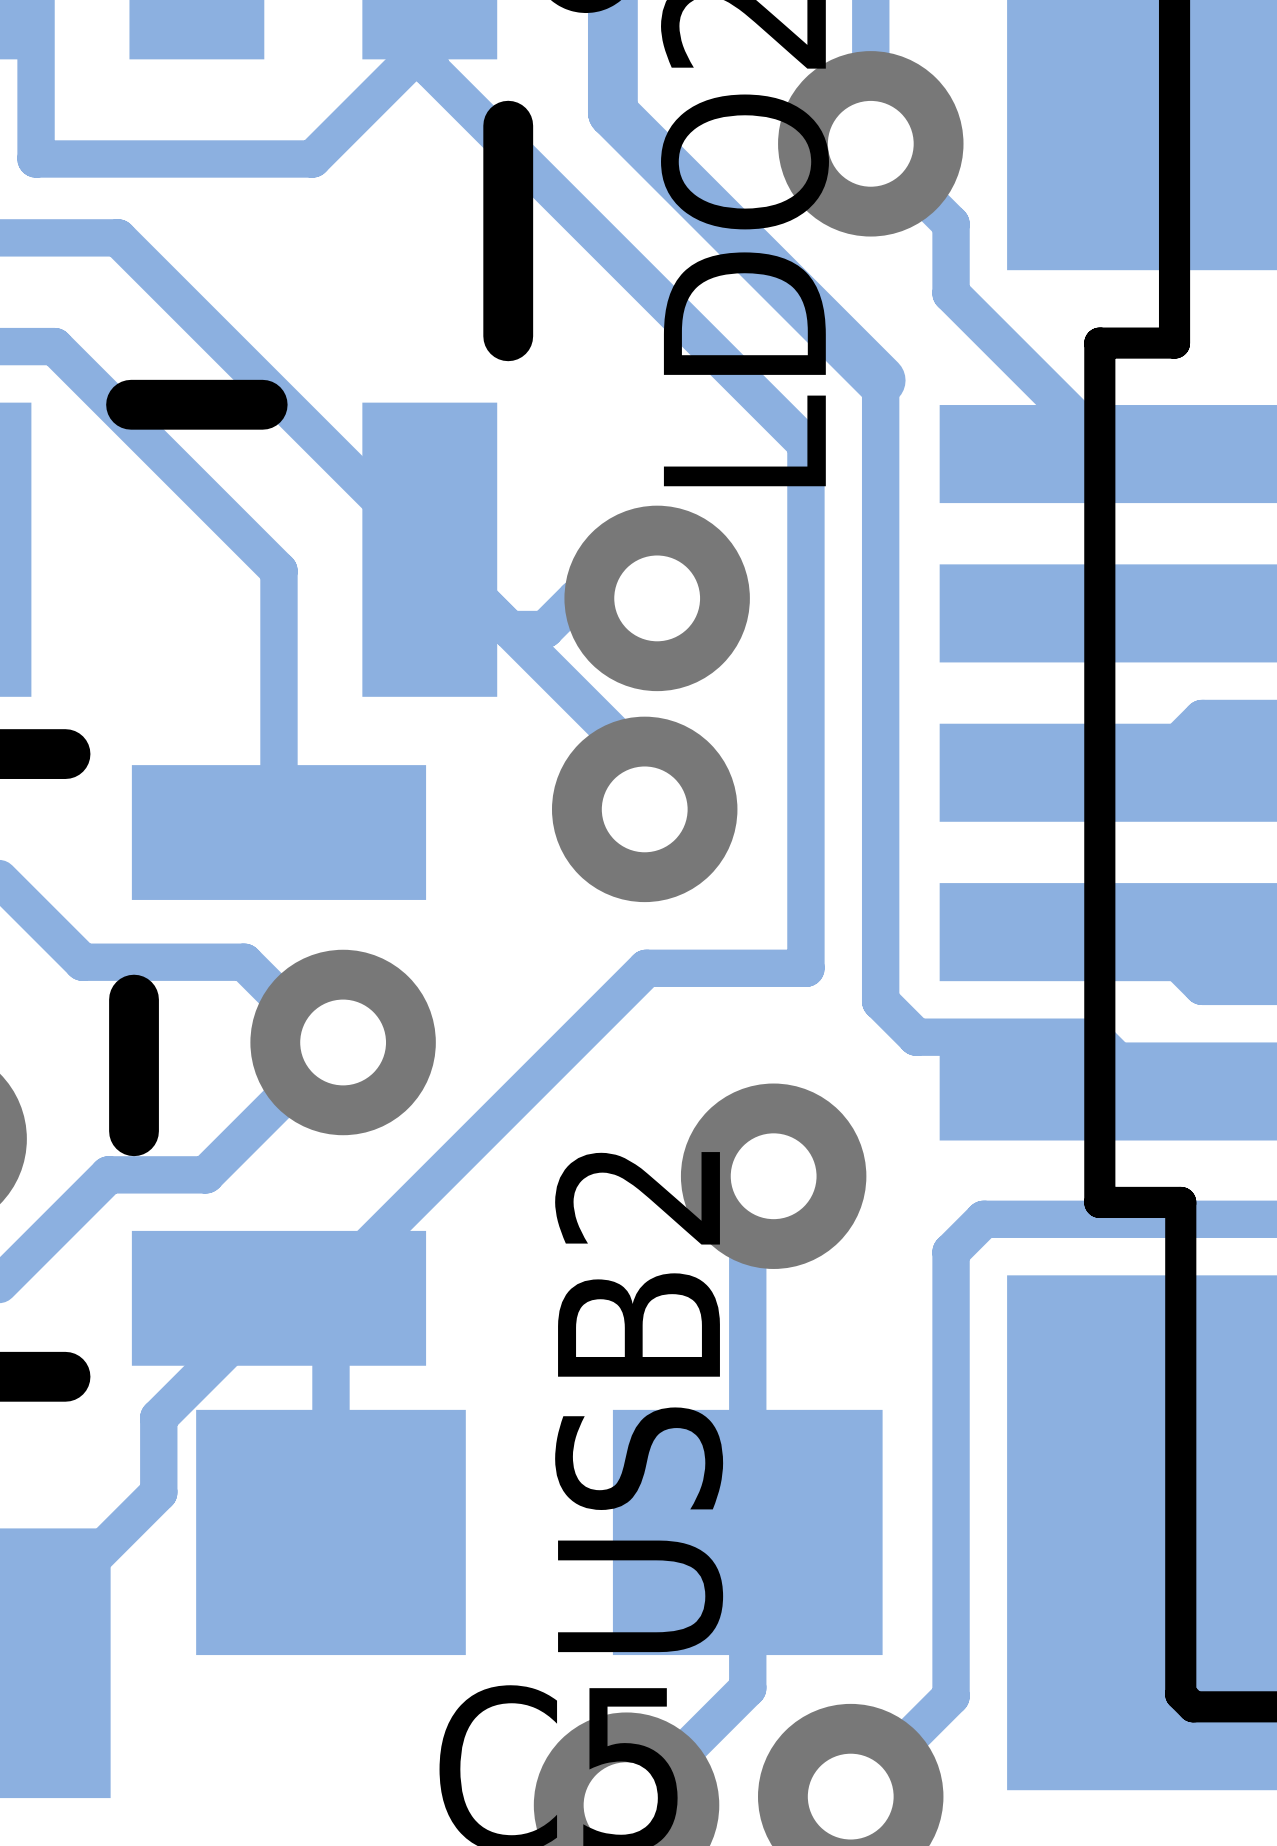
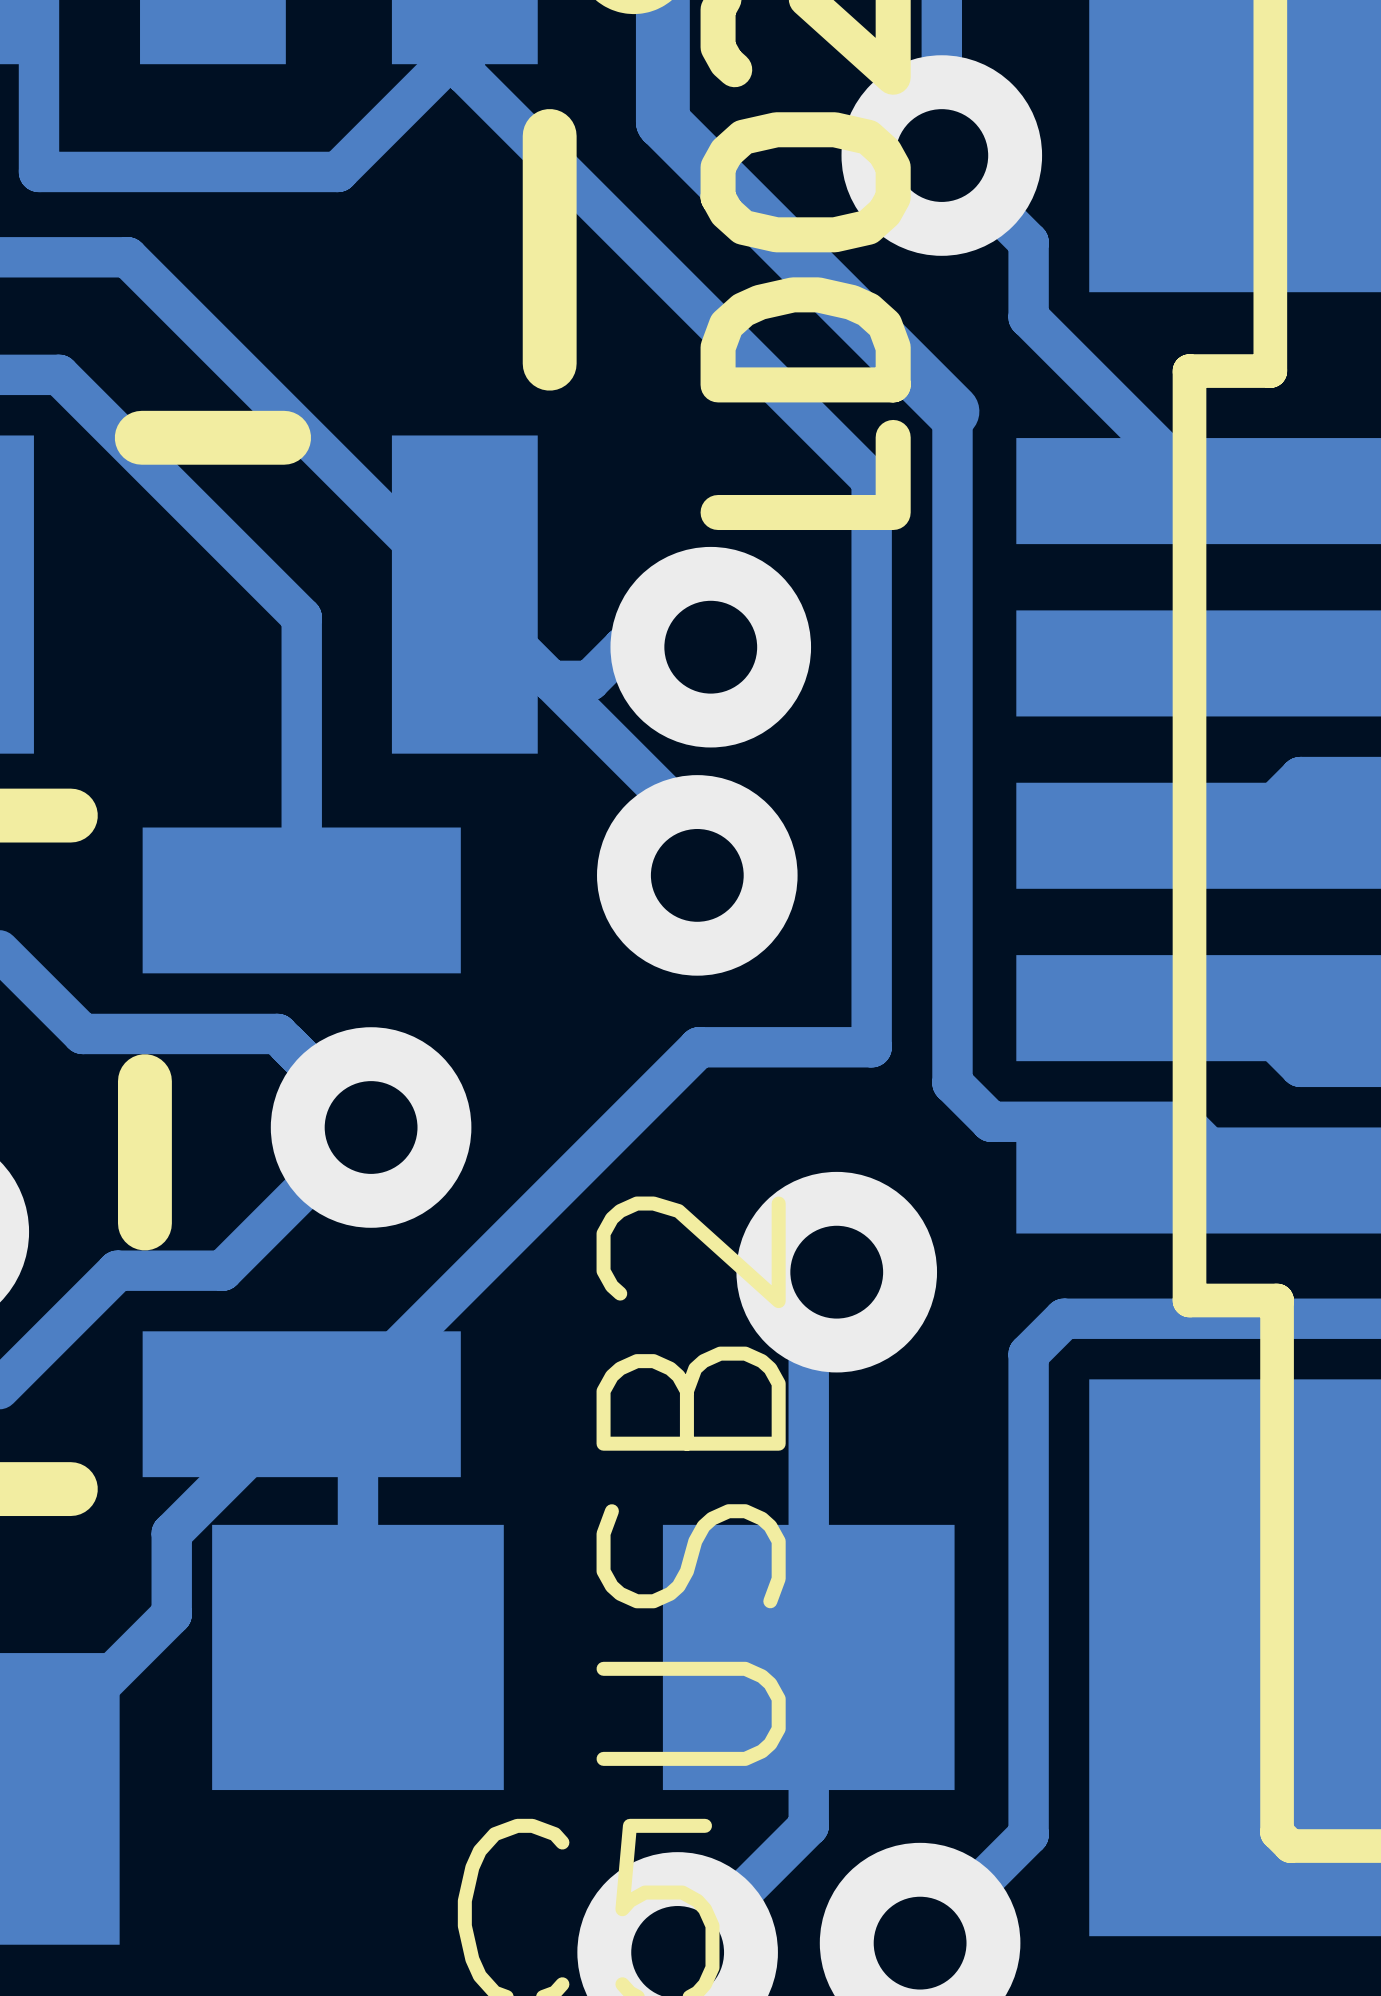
track: (76, 955) (82, 962) (244, 962) (324, 1042) (343, 1042) -> (82, 1033) (277, 1033) (371, 1127)

